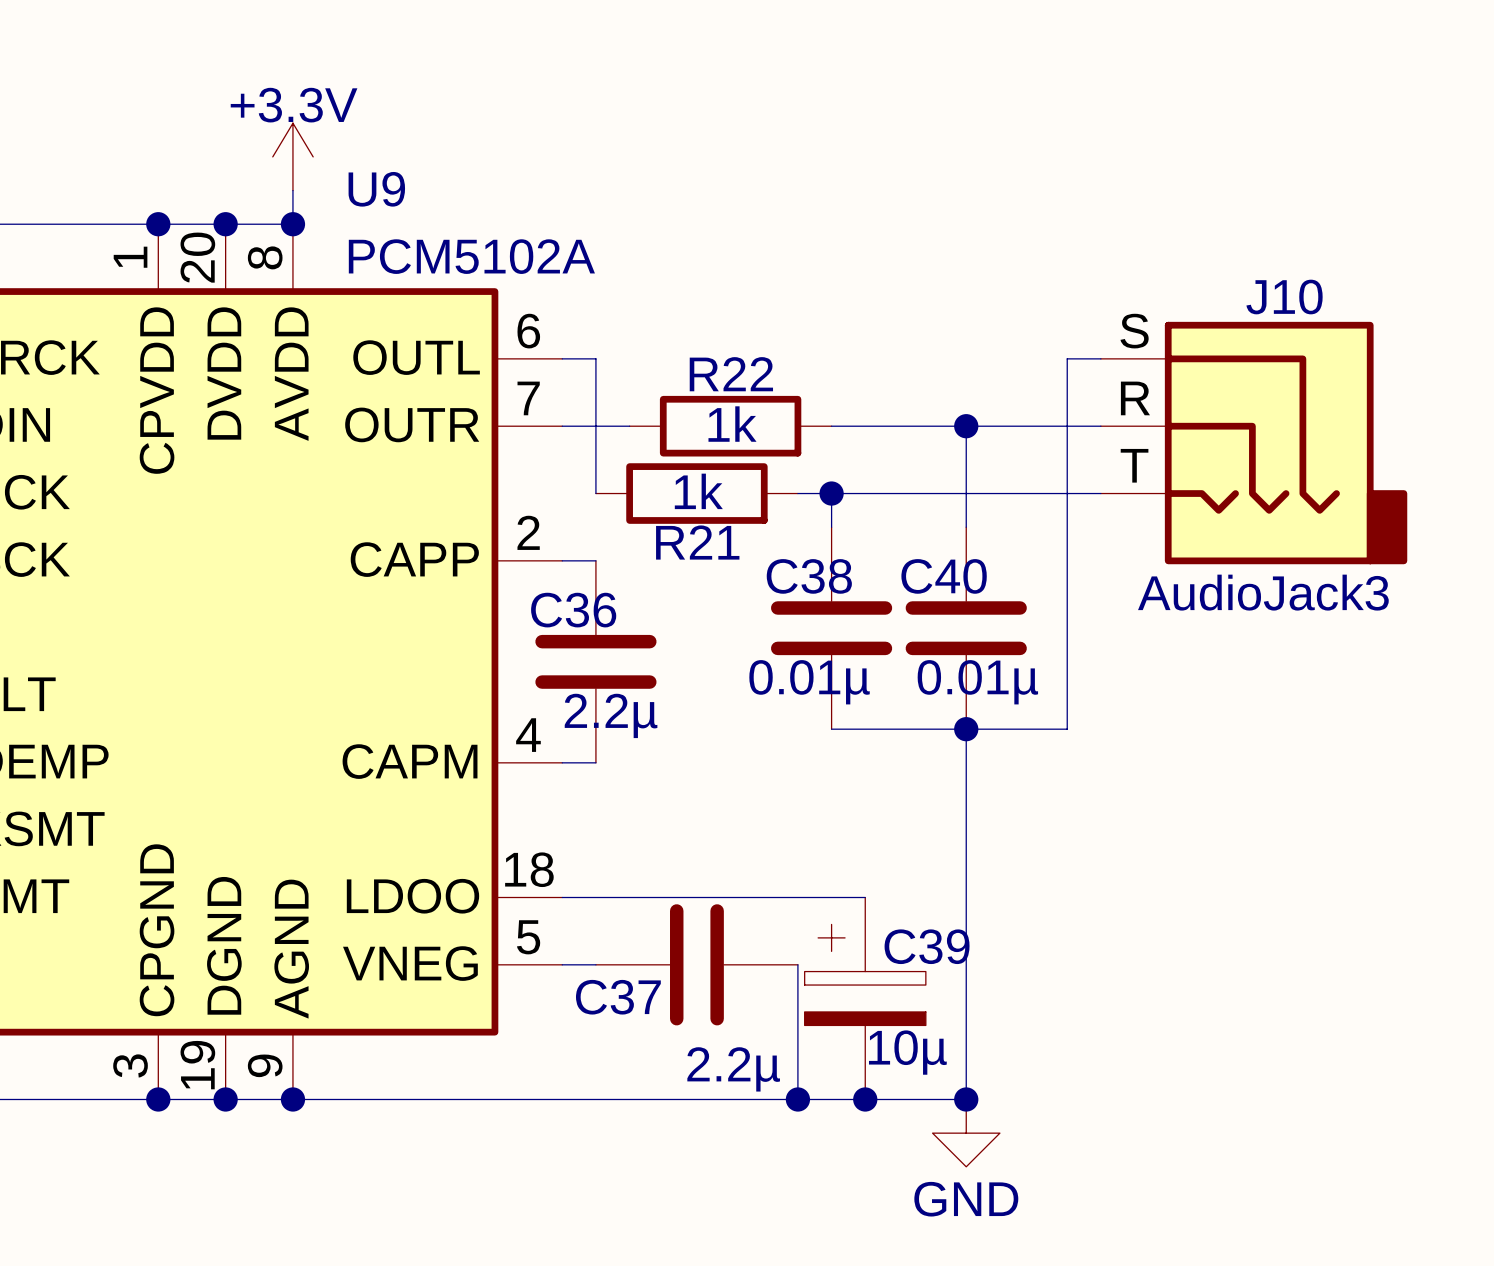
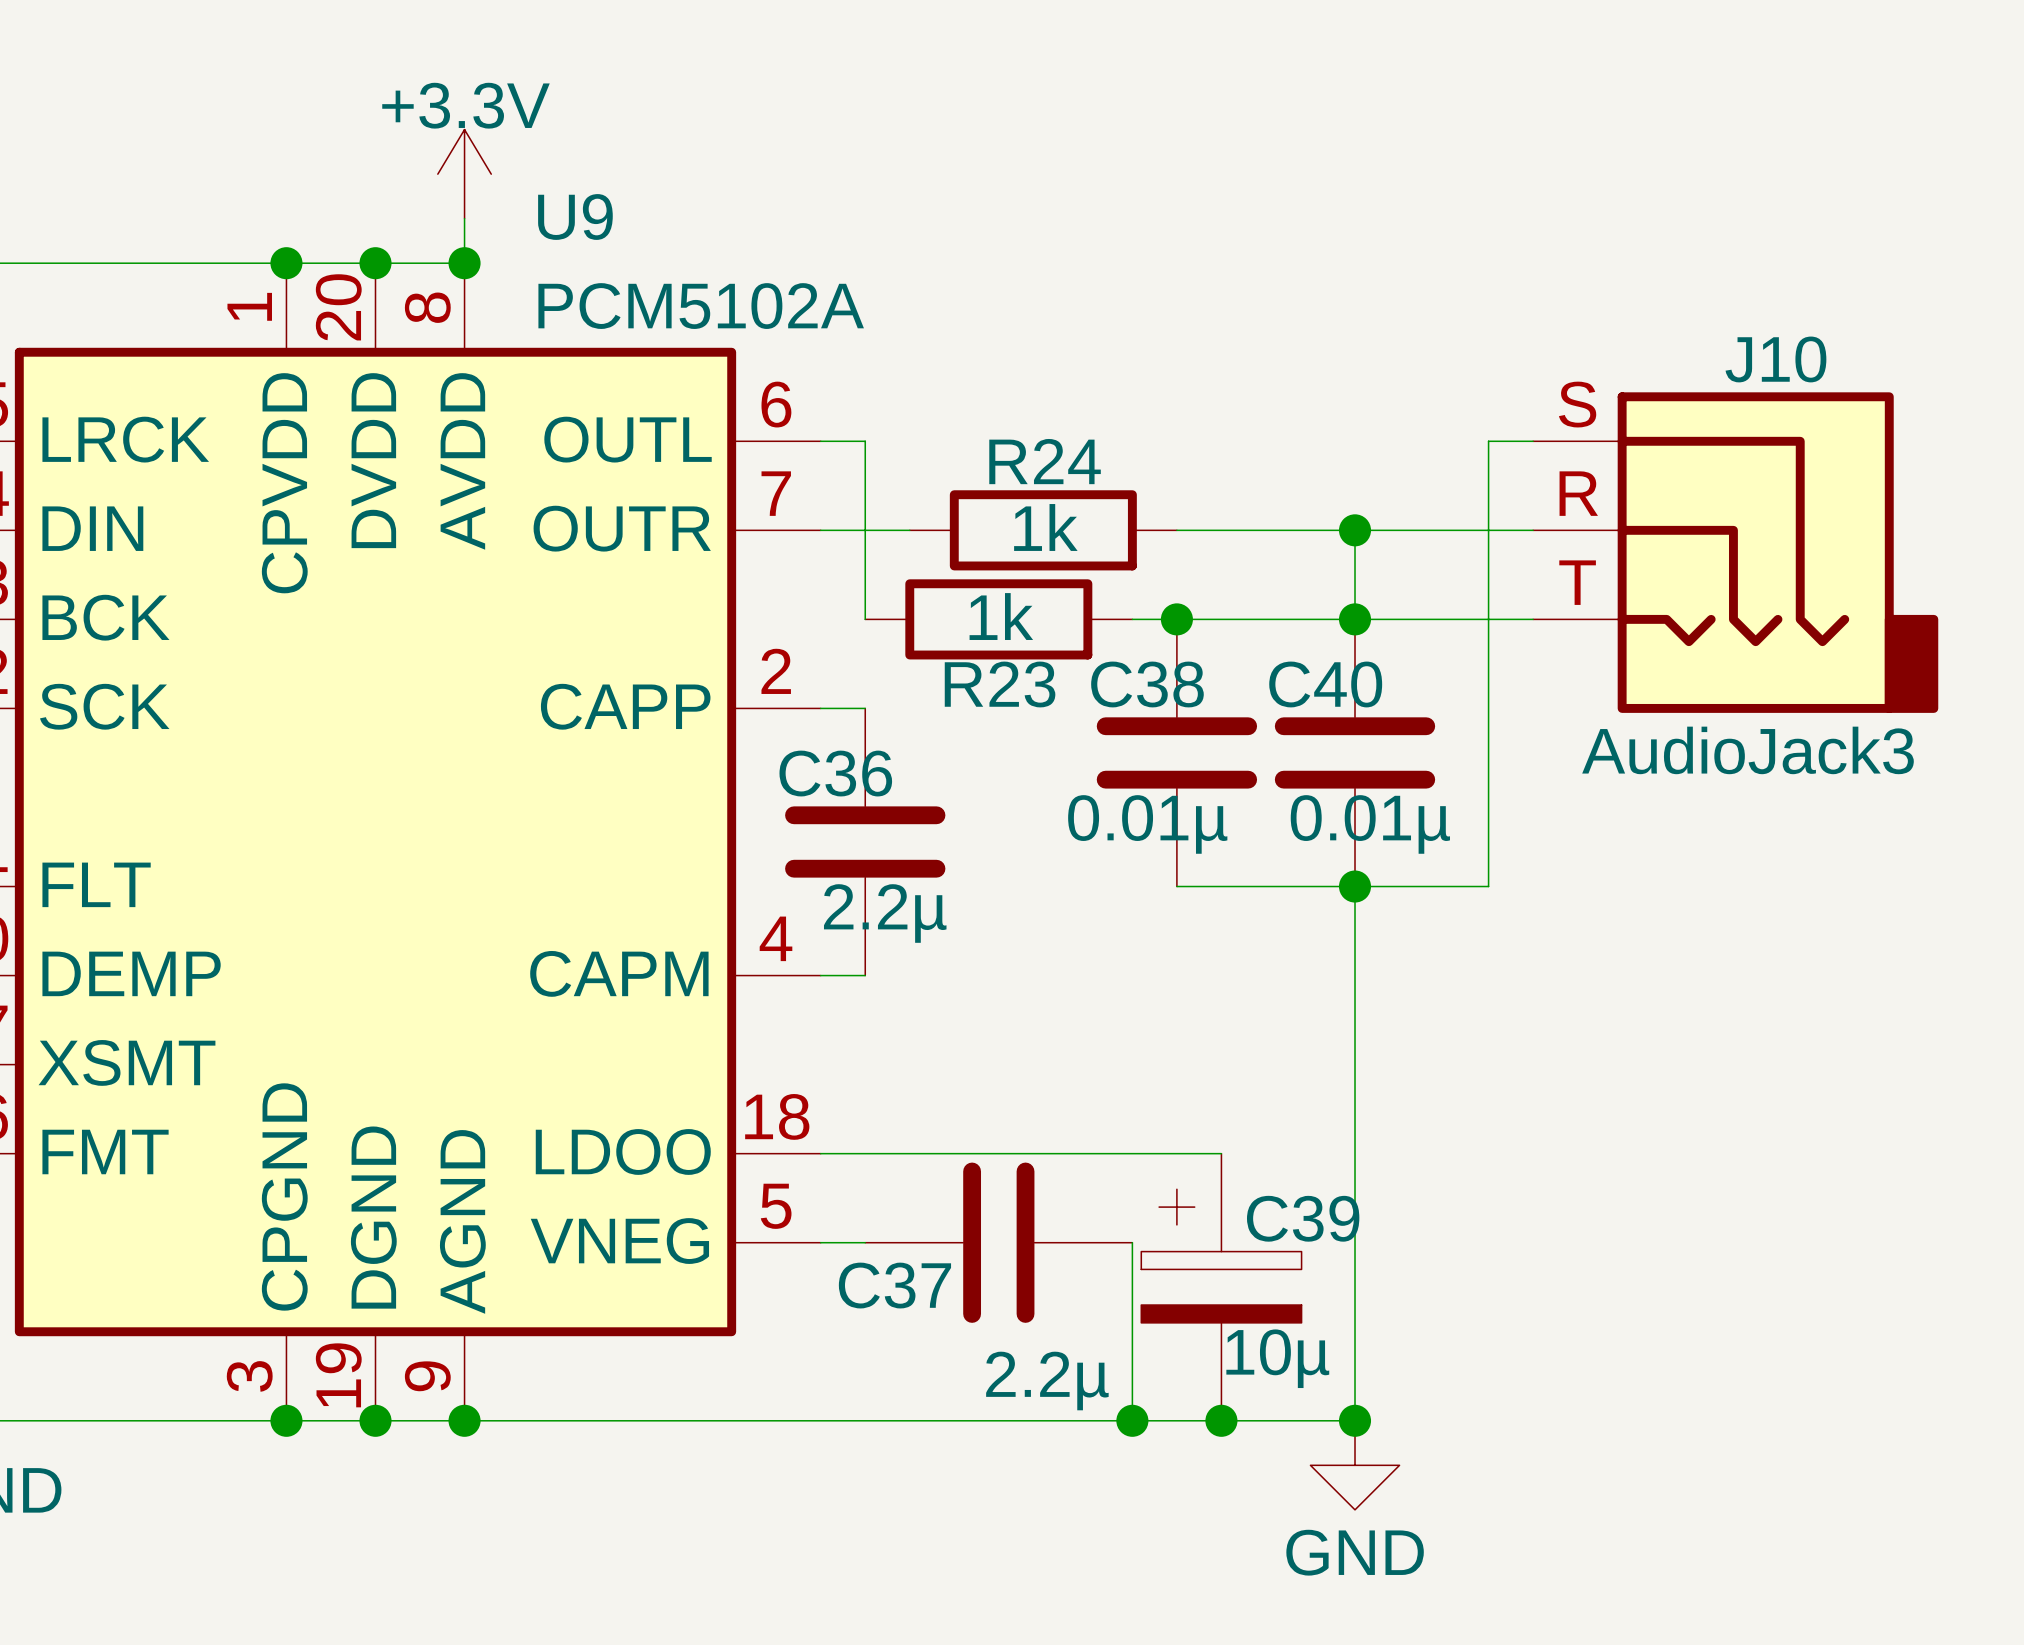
R22 name: R22 (731, 374) -> R24 (1045, 461)
junction: none -> (1355, 619)
R21 name: R21 (697, 542) -> R23 (1000, 684)
C38 position: (831, 628) -> (1176, 752)
C40 position: (966, 628) -> (1355, 752)
wire: (1067, 695) (1067, 729) (831, 729) -> (1488, 886) (1176, 886)
junction position: (966, 729) -> (1355, 886)

